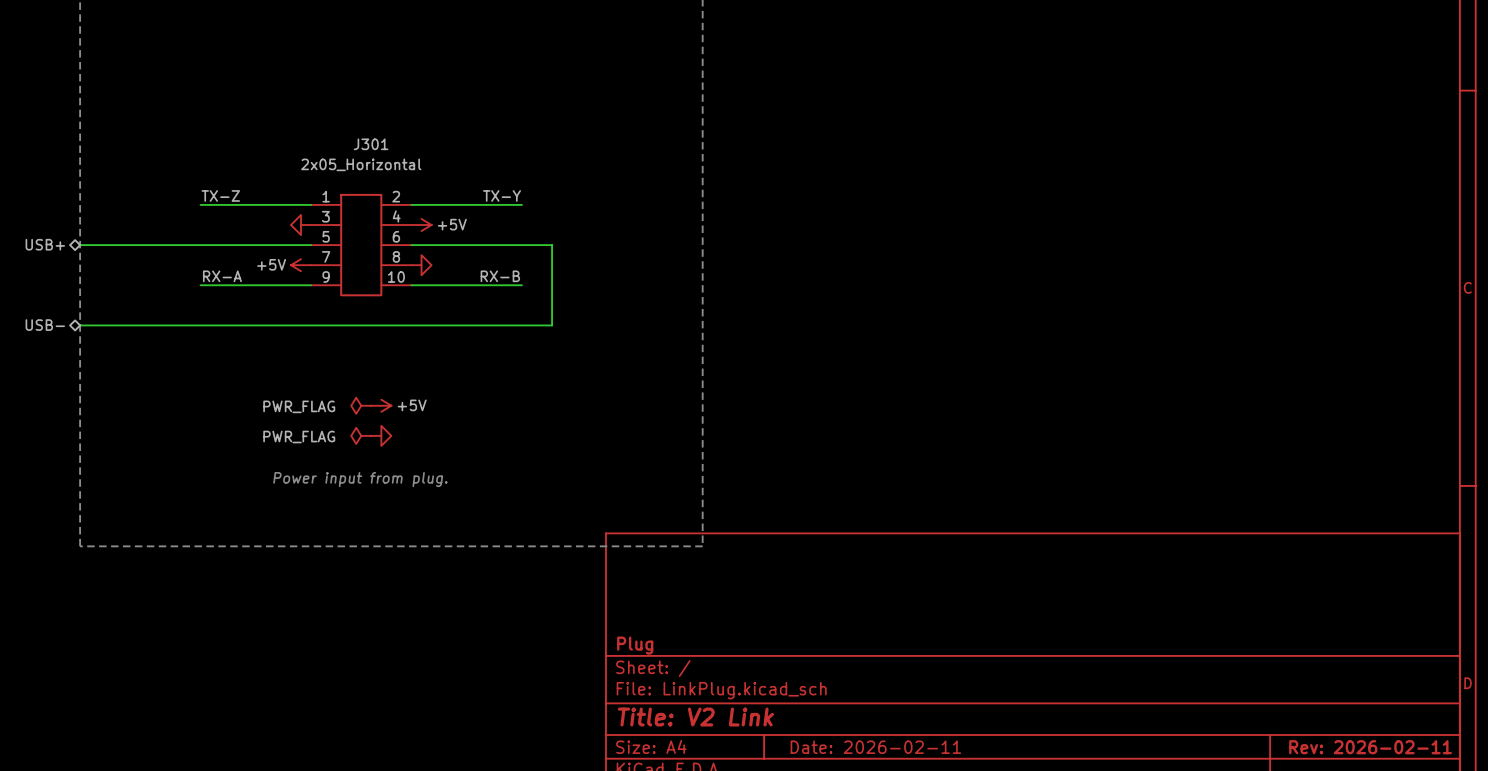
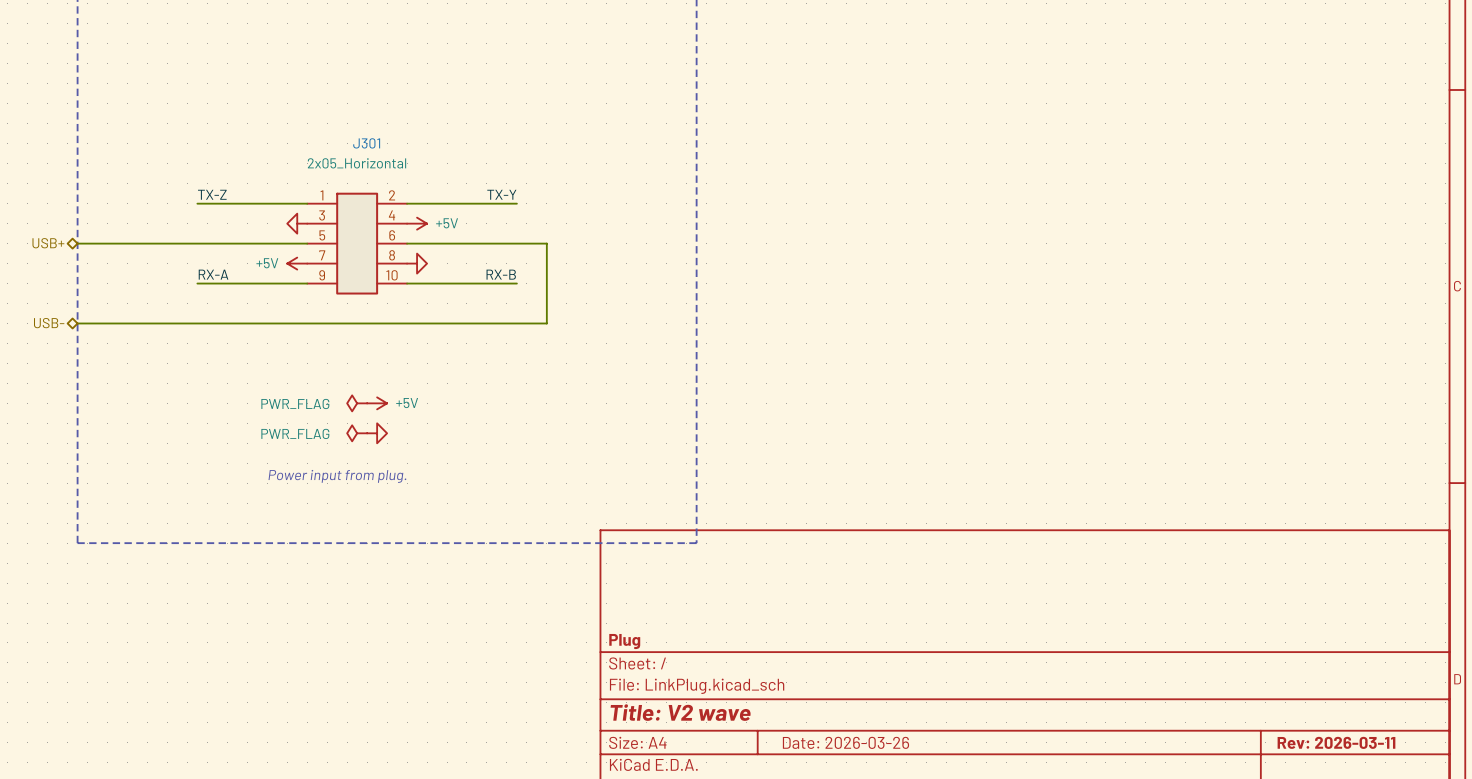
title block: Title: V2 Link (695, 717) -> Title: V2 wave (680, 712)
title block: Date: 2026-02-11 (875, 747) -> Date: 2026-03-26 (845, 742)
title block: Rev: 2026-02-11 (1370, 747) -> Rev: 2026-03-11 (1336, 742)

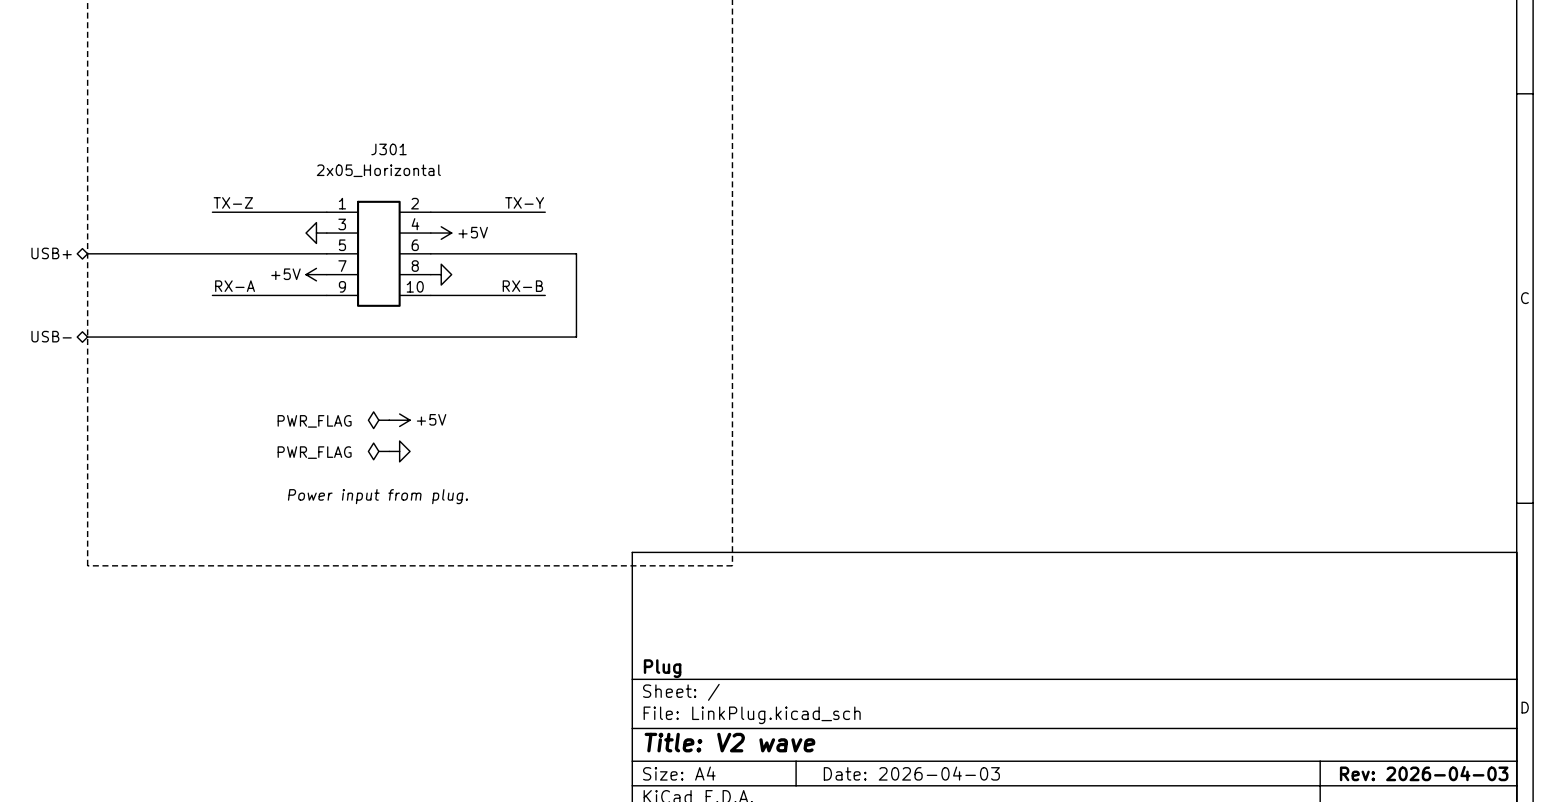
title block: Date: 2026-03-26 (845, 742) -> Date: 2026-04-03 (911, 773)
title block: Rev: 2026-03-11 (1336, 742) -> Rev: 2026-04-03 (1424, 773)

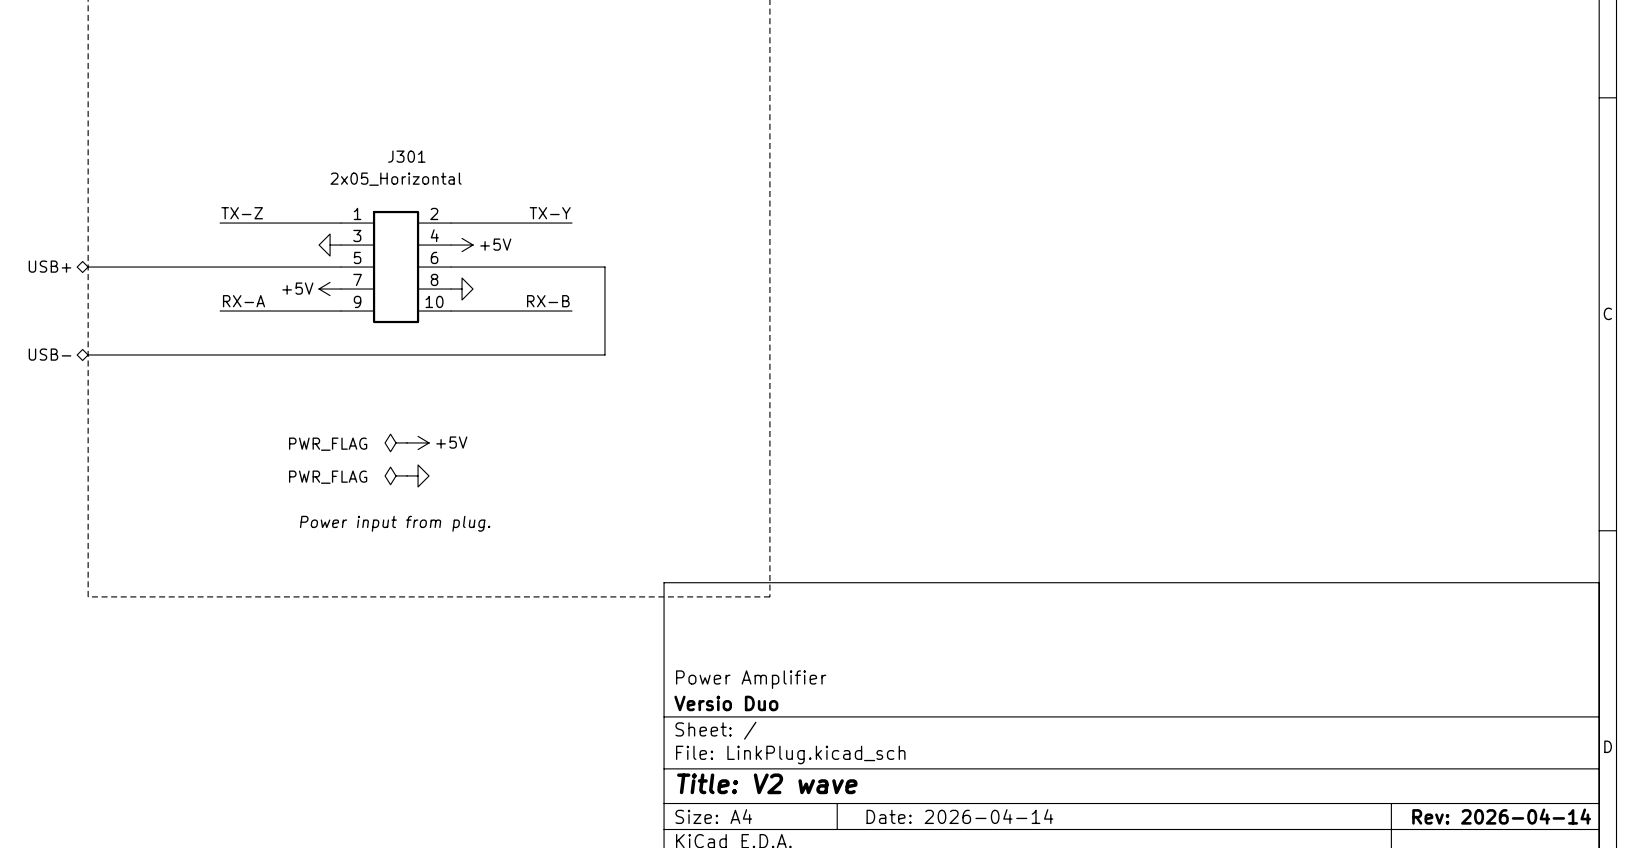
title block: none -> Power Amplifier (751, 679)
title block: Plug (662, 668) -> Versio Duo (726, 703)
title block: Date: 2026-04-03 (911, 773) -> Date: 2026-04-14 (959, 816)
title block: Rev: 2026-04-03 (1424, 773) -> Rev: 2026-04-14 (1501, 816)

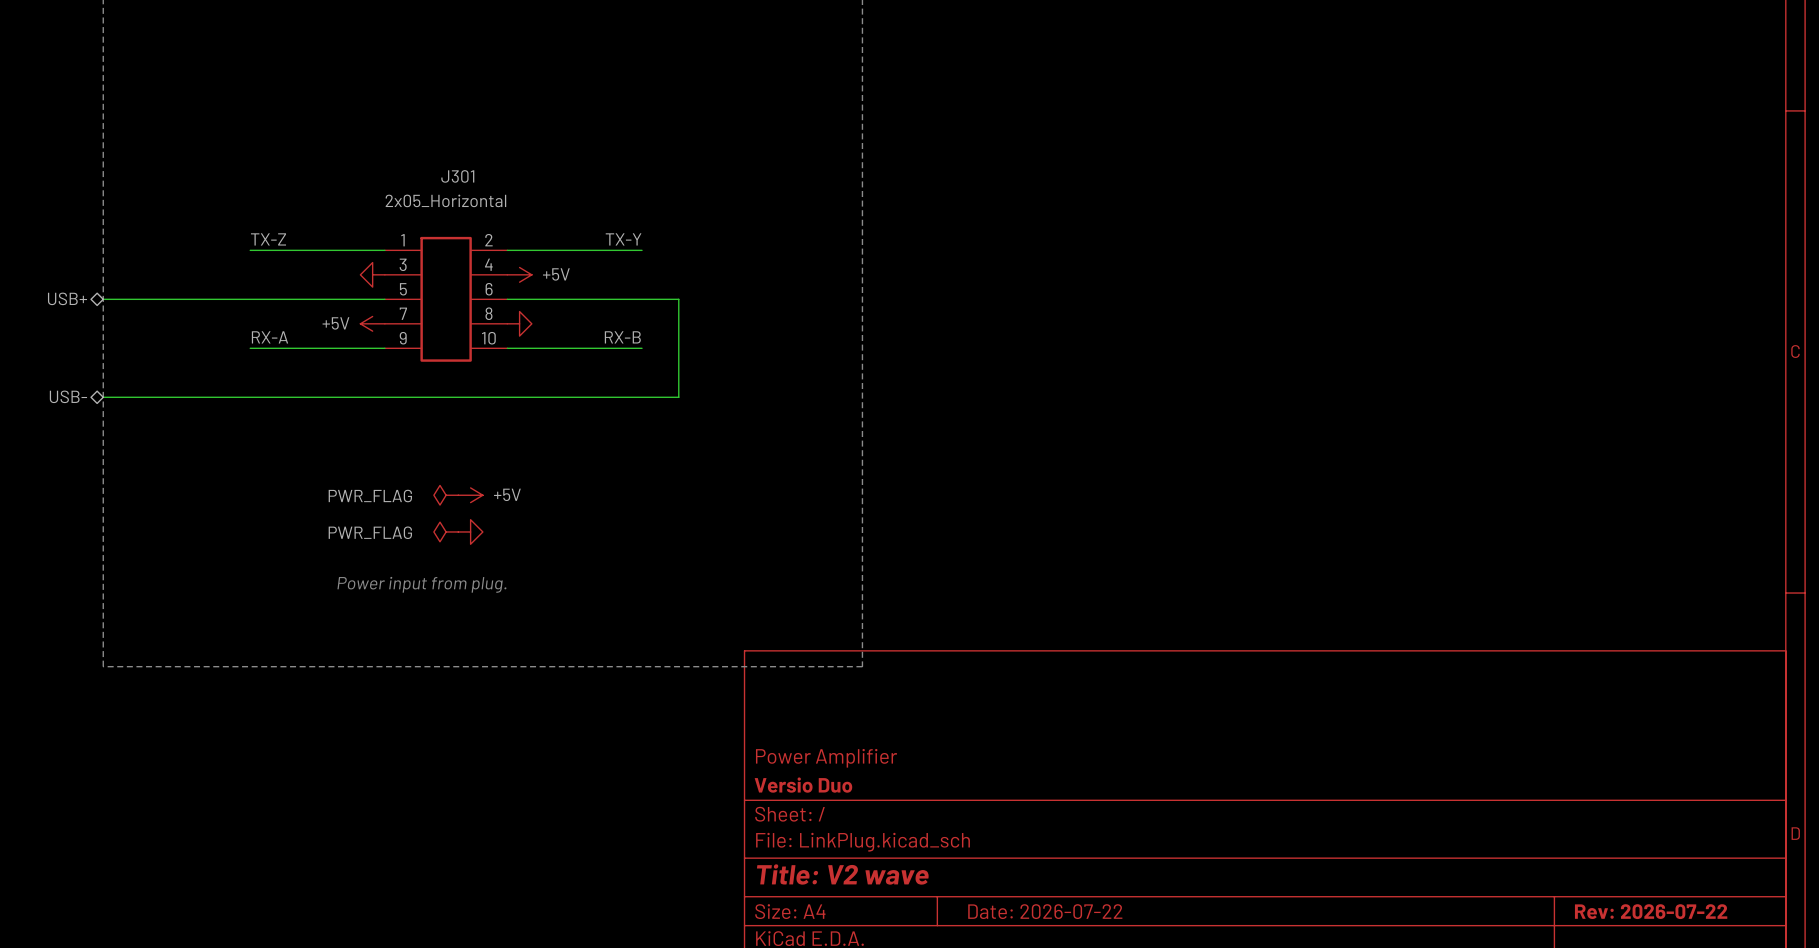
title block: Date: 2026-04-14 (959, 816) -> Date: 2026-07-22 (1045, 911)
title block: Rev: 2026-04-14 (1501, 816) -> Rev: 2026-07-22 (1651, 911)

